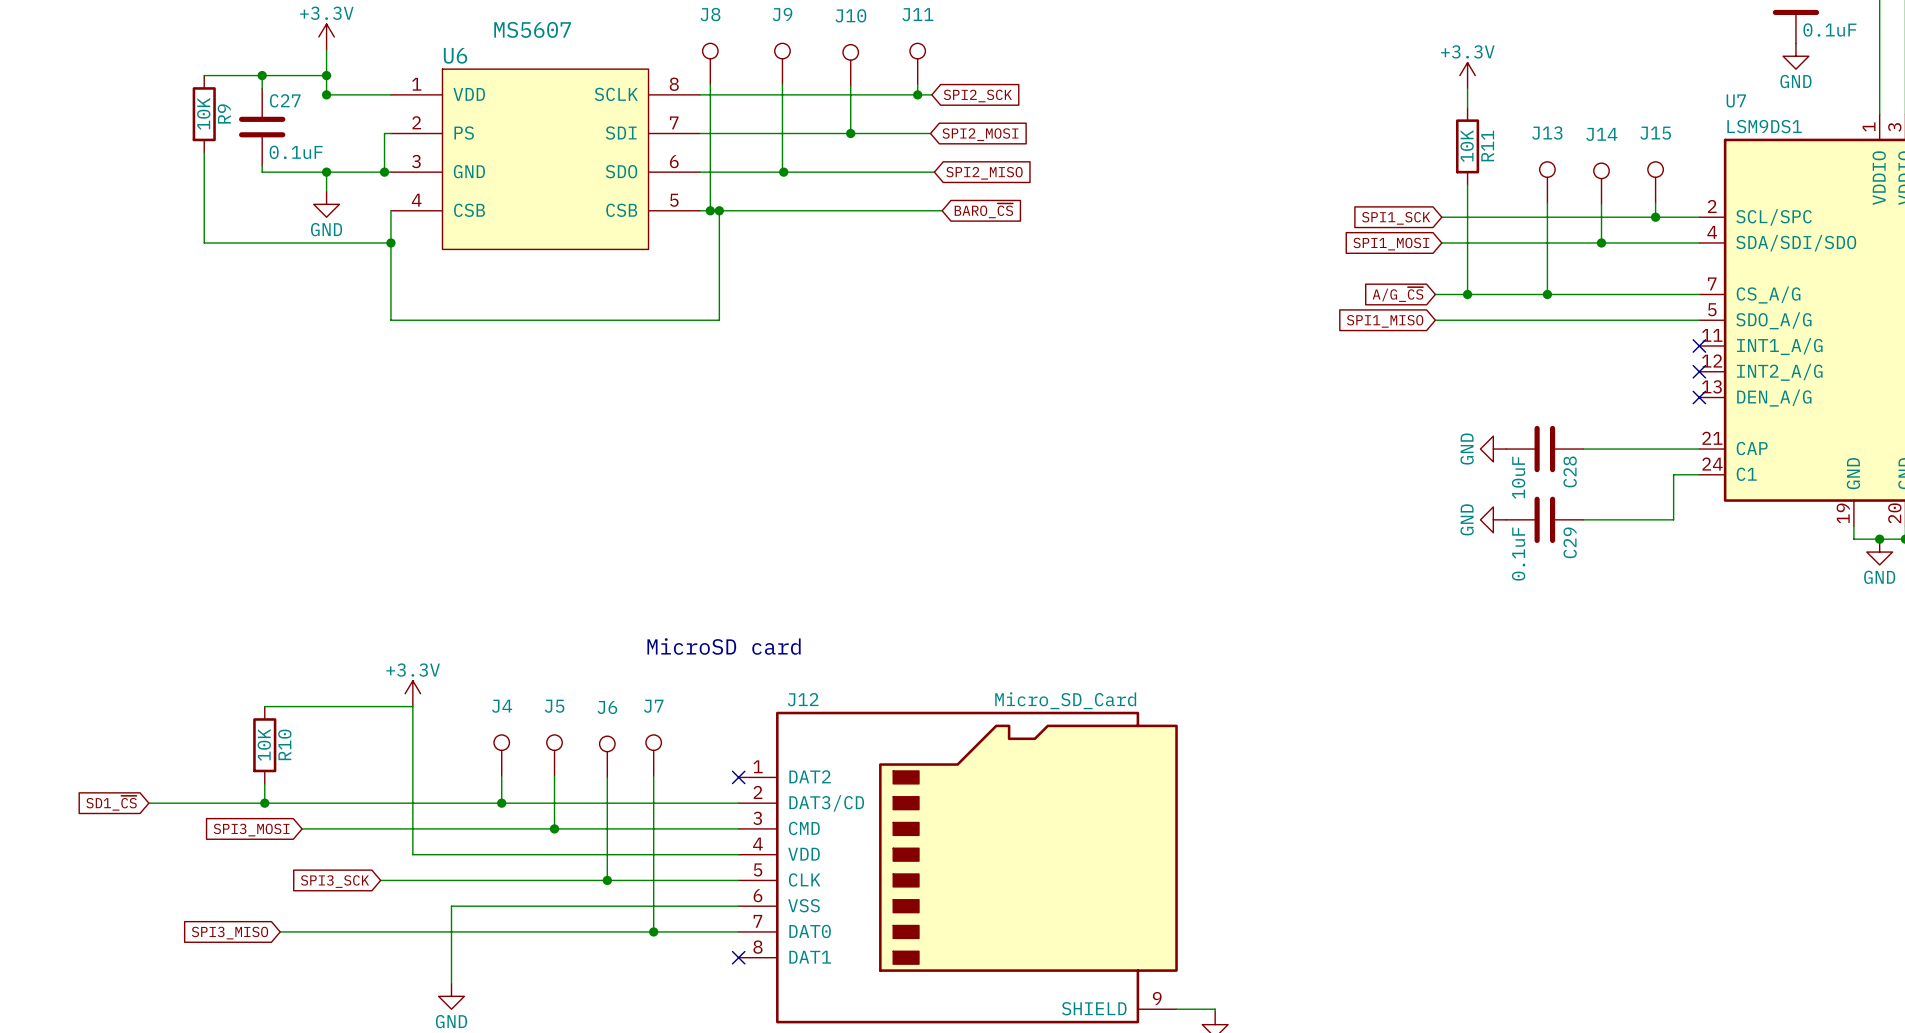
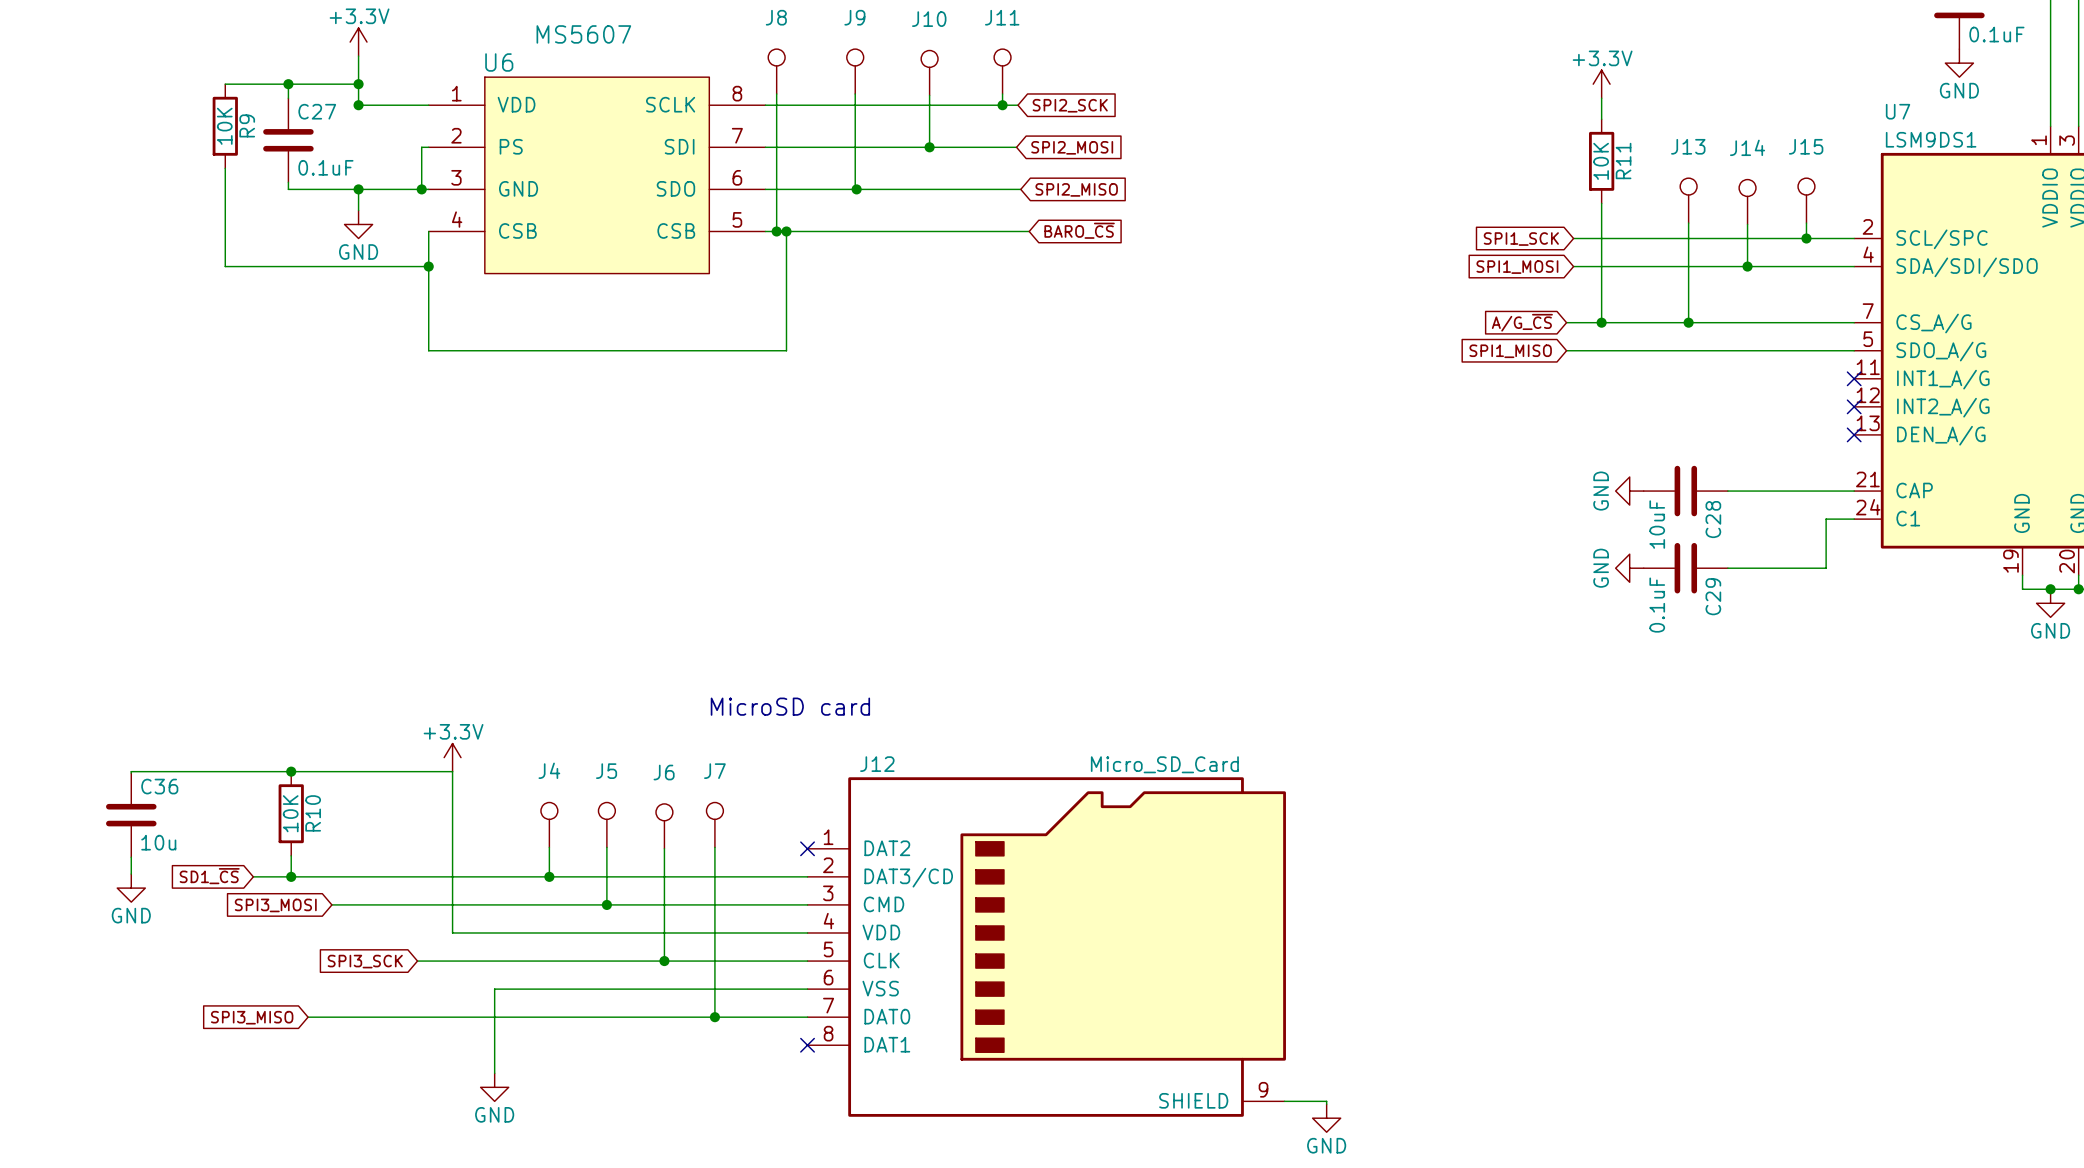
wire: none -> (291, 771) (131, 773)
junction: none -> (291, 771)
C36: none -> 10u (131, 815)
wire: none -> (131, 857) (131, 874)
global label position: SD1_~{CS} (111, 803) -> SD1_~{CS} (209, 876)
wire: (148, 803) (229, 803) -> none
power symbol: none -> GND (131, 888)

